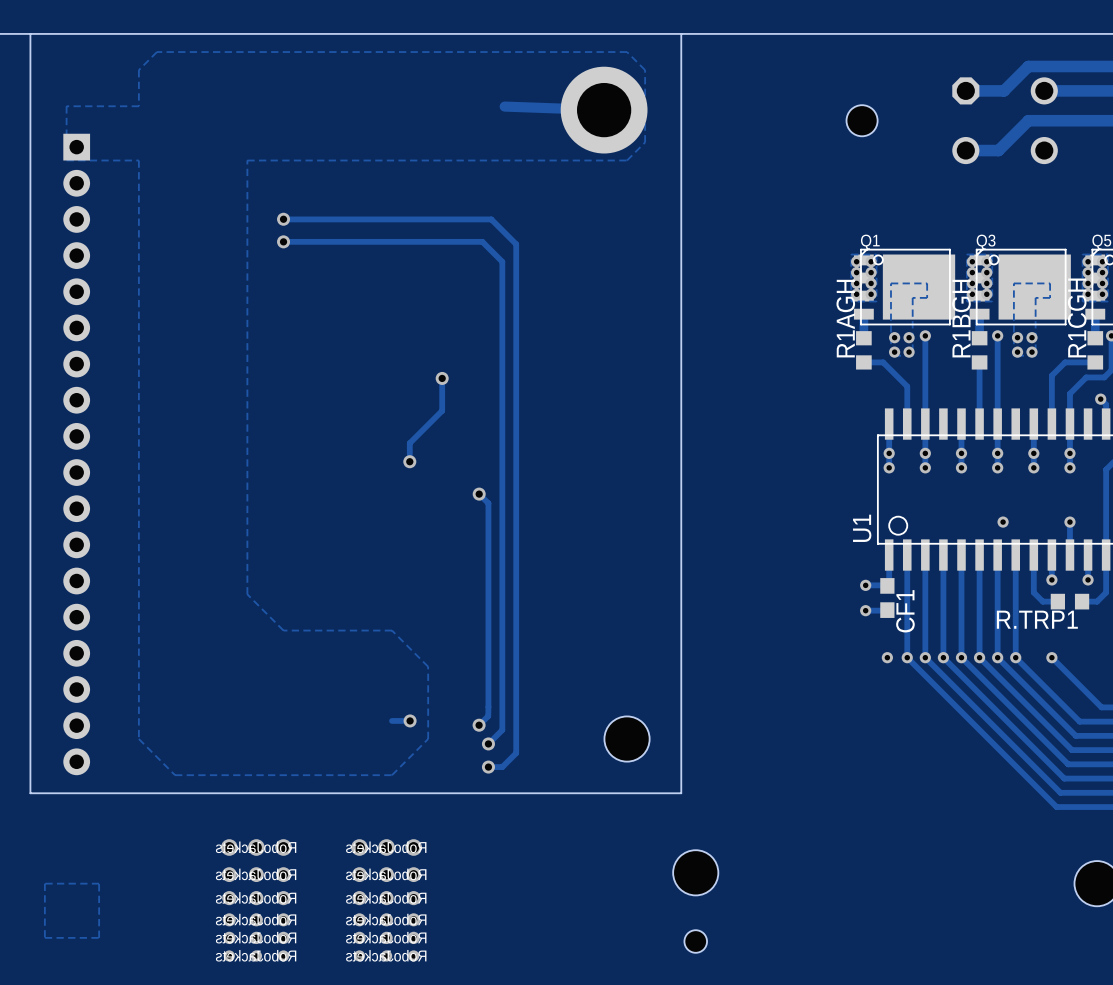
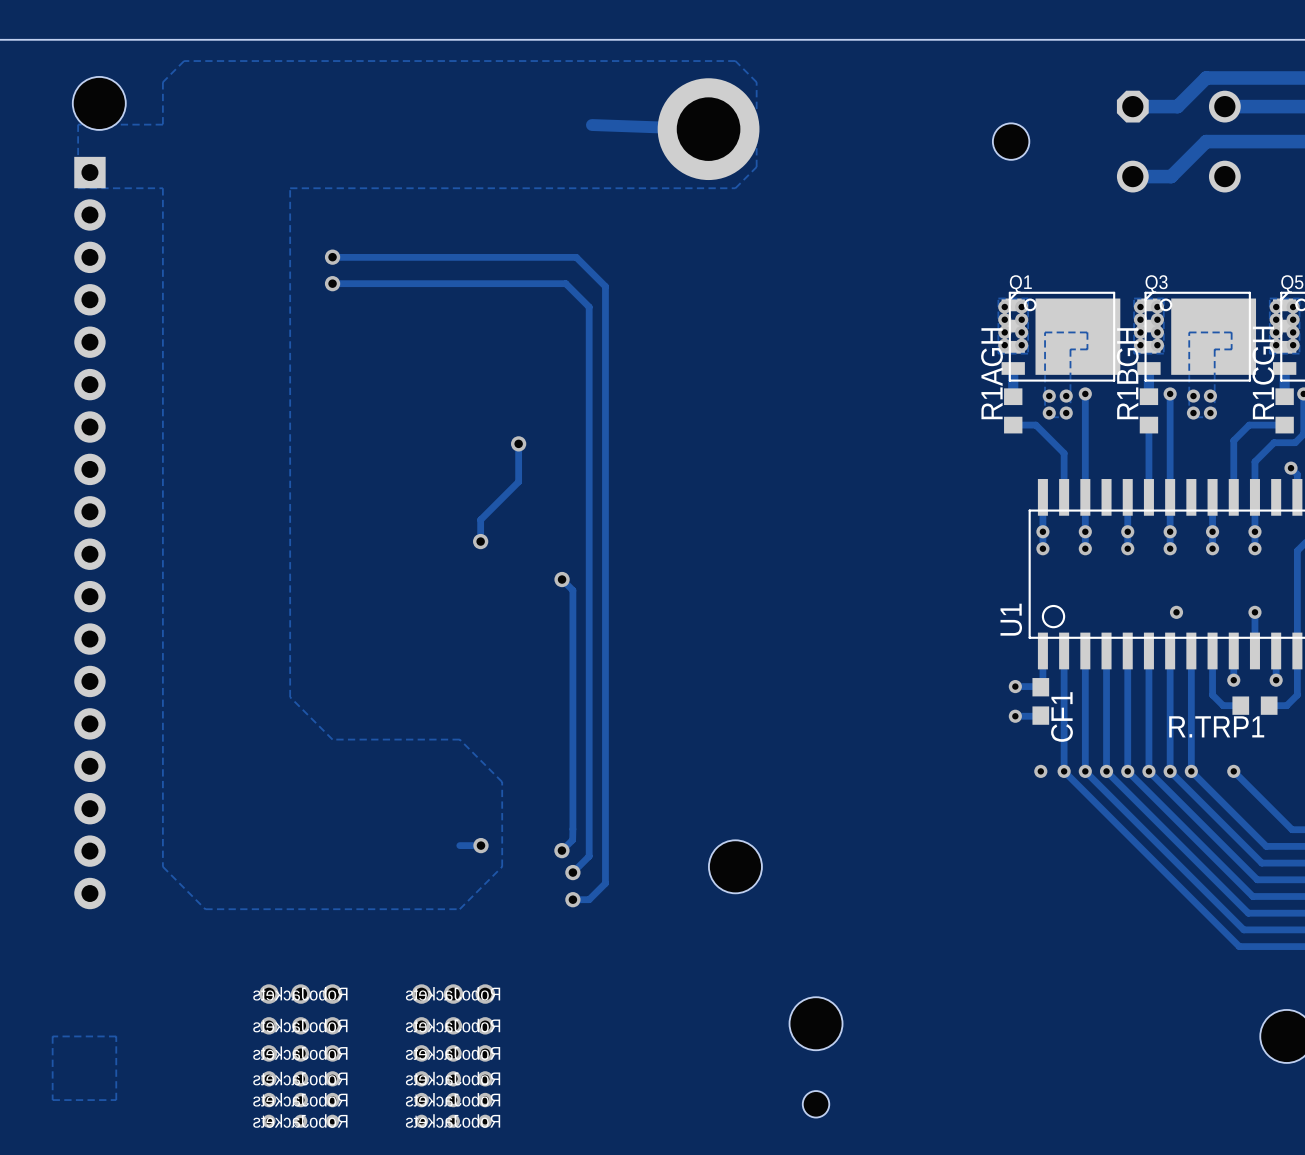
board edge: (681, 33) (681, 793) (30, 793) (30, 33) -> none
hole: none -> (99, 103)

